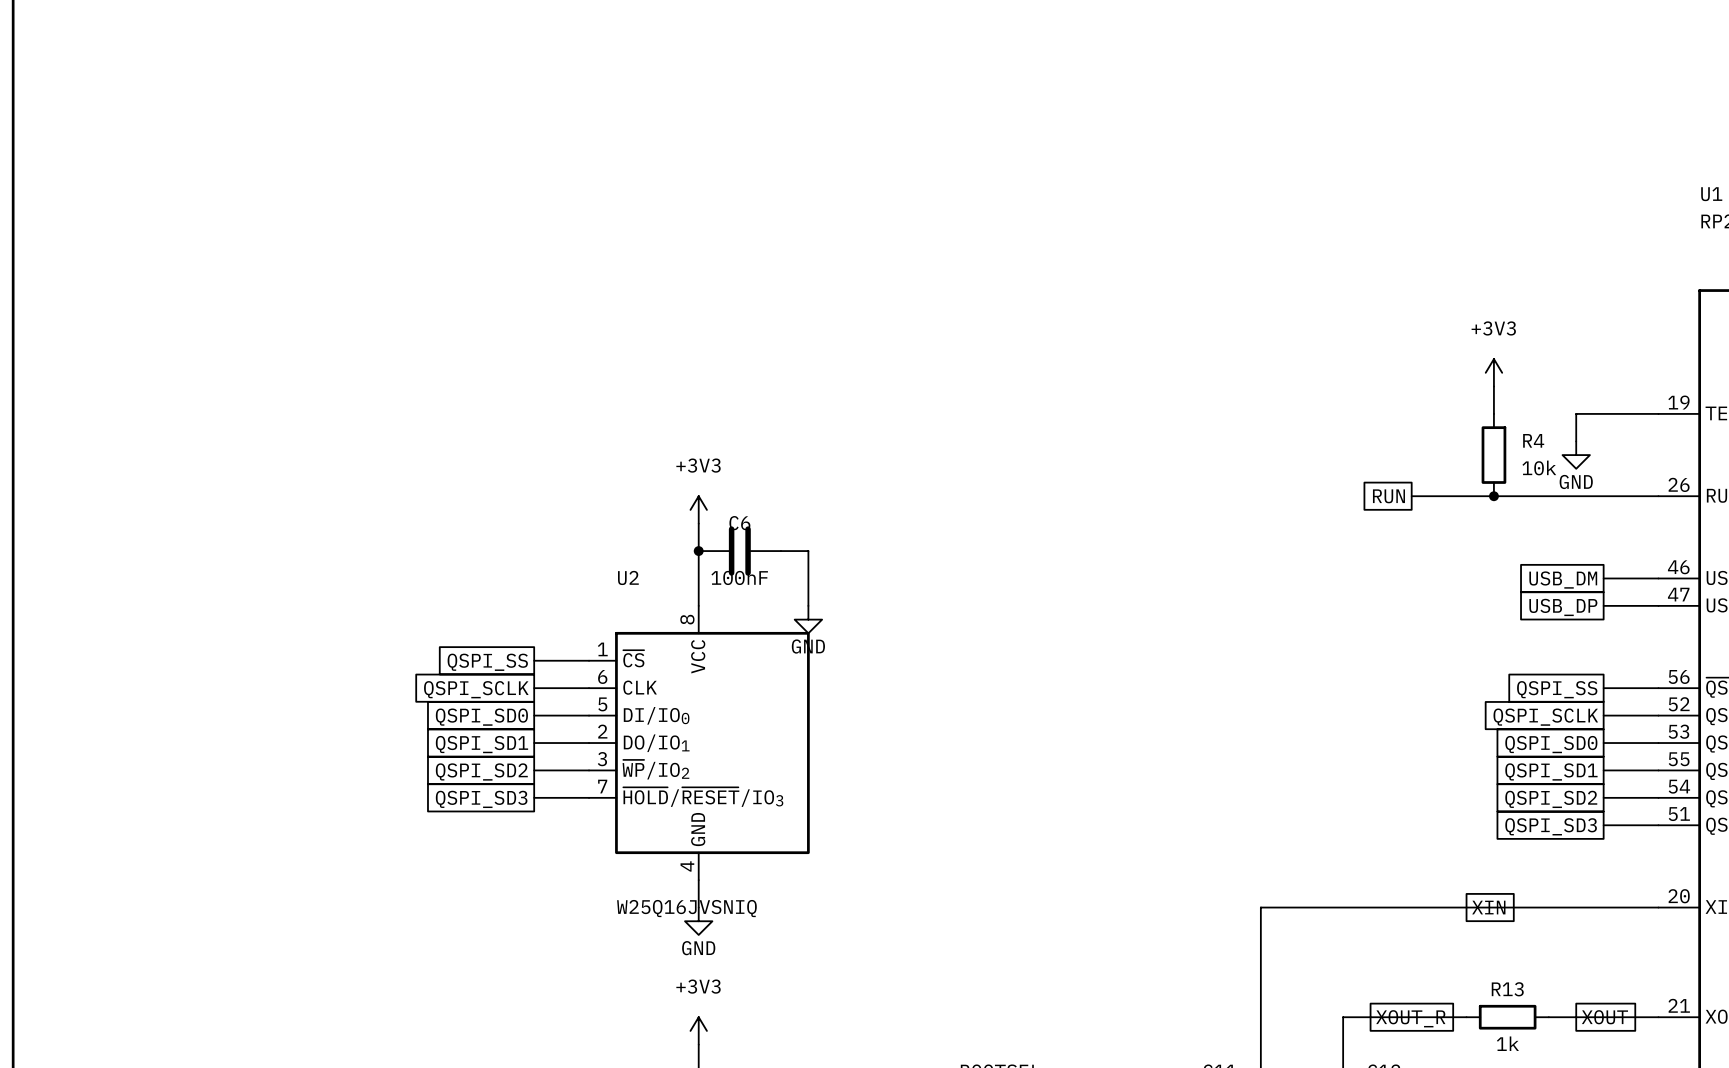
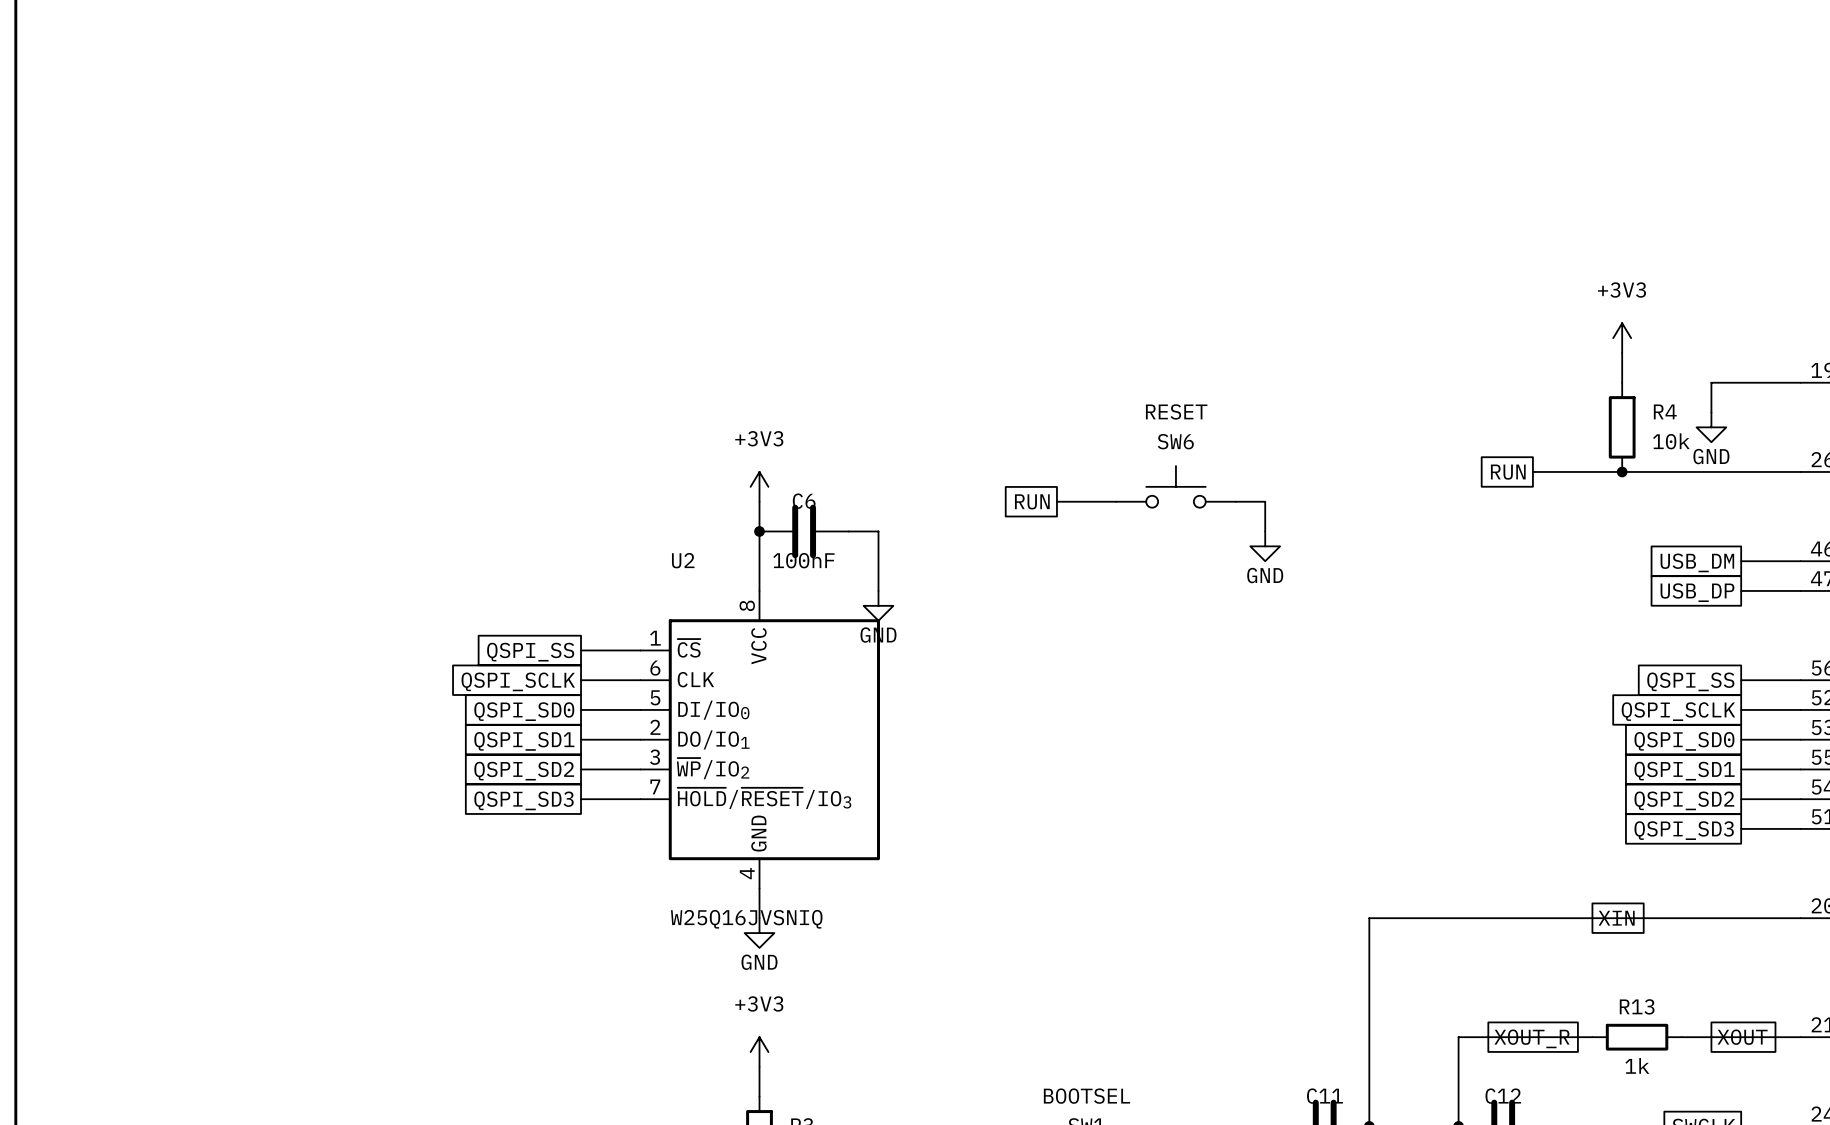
SW6: none -> RESET (1175, 486)
global label: none -> RUN (1032, 501)
wire: none -> (1056, 501) (1116, 501)
wire: none -> (1235, 501) (1265, 501) (1265, 531)
power symbol: none -> GND (1265, 546)

